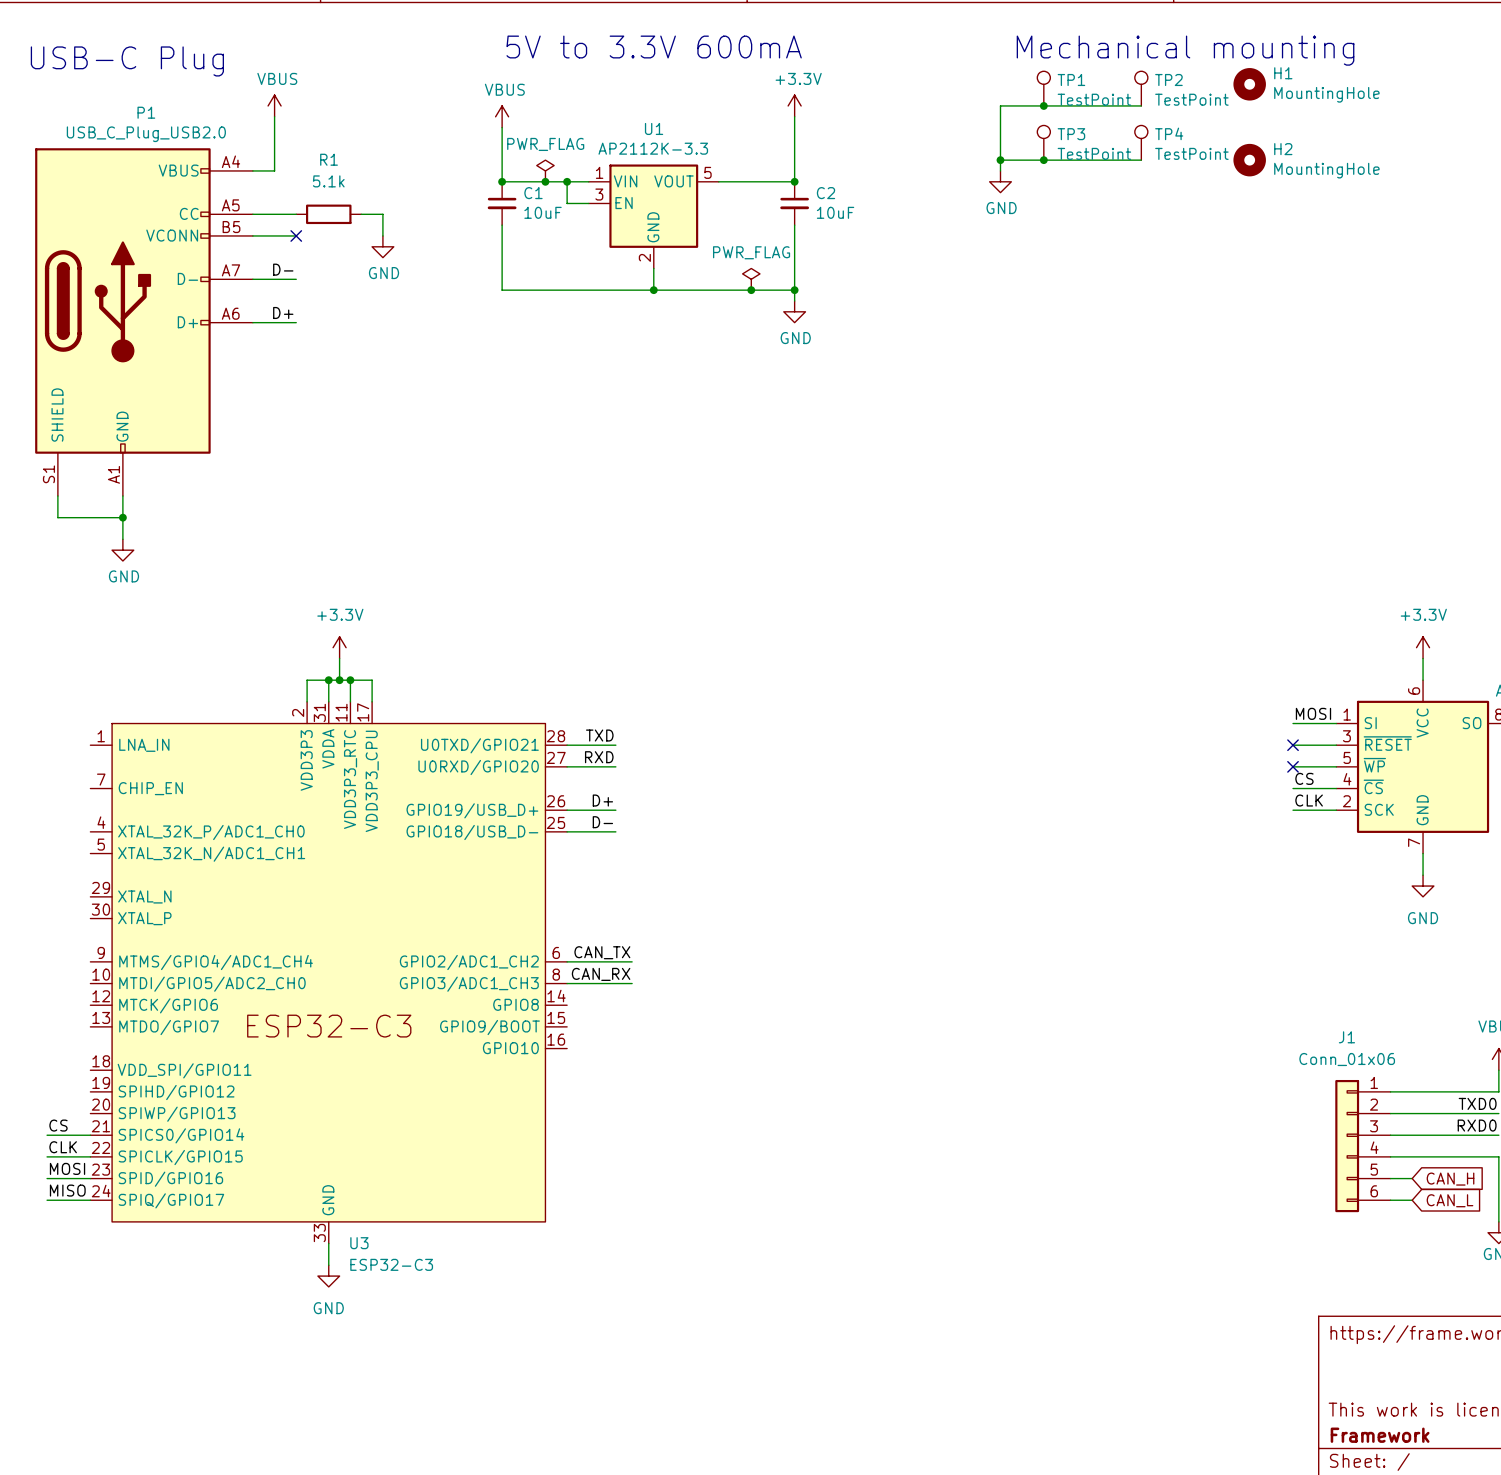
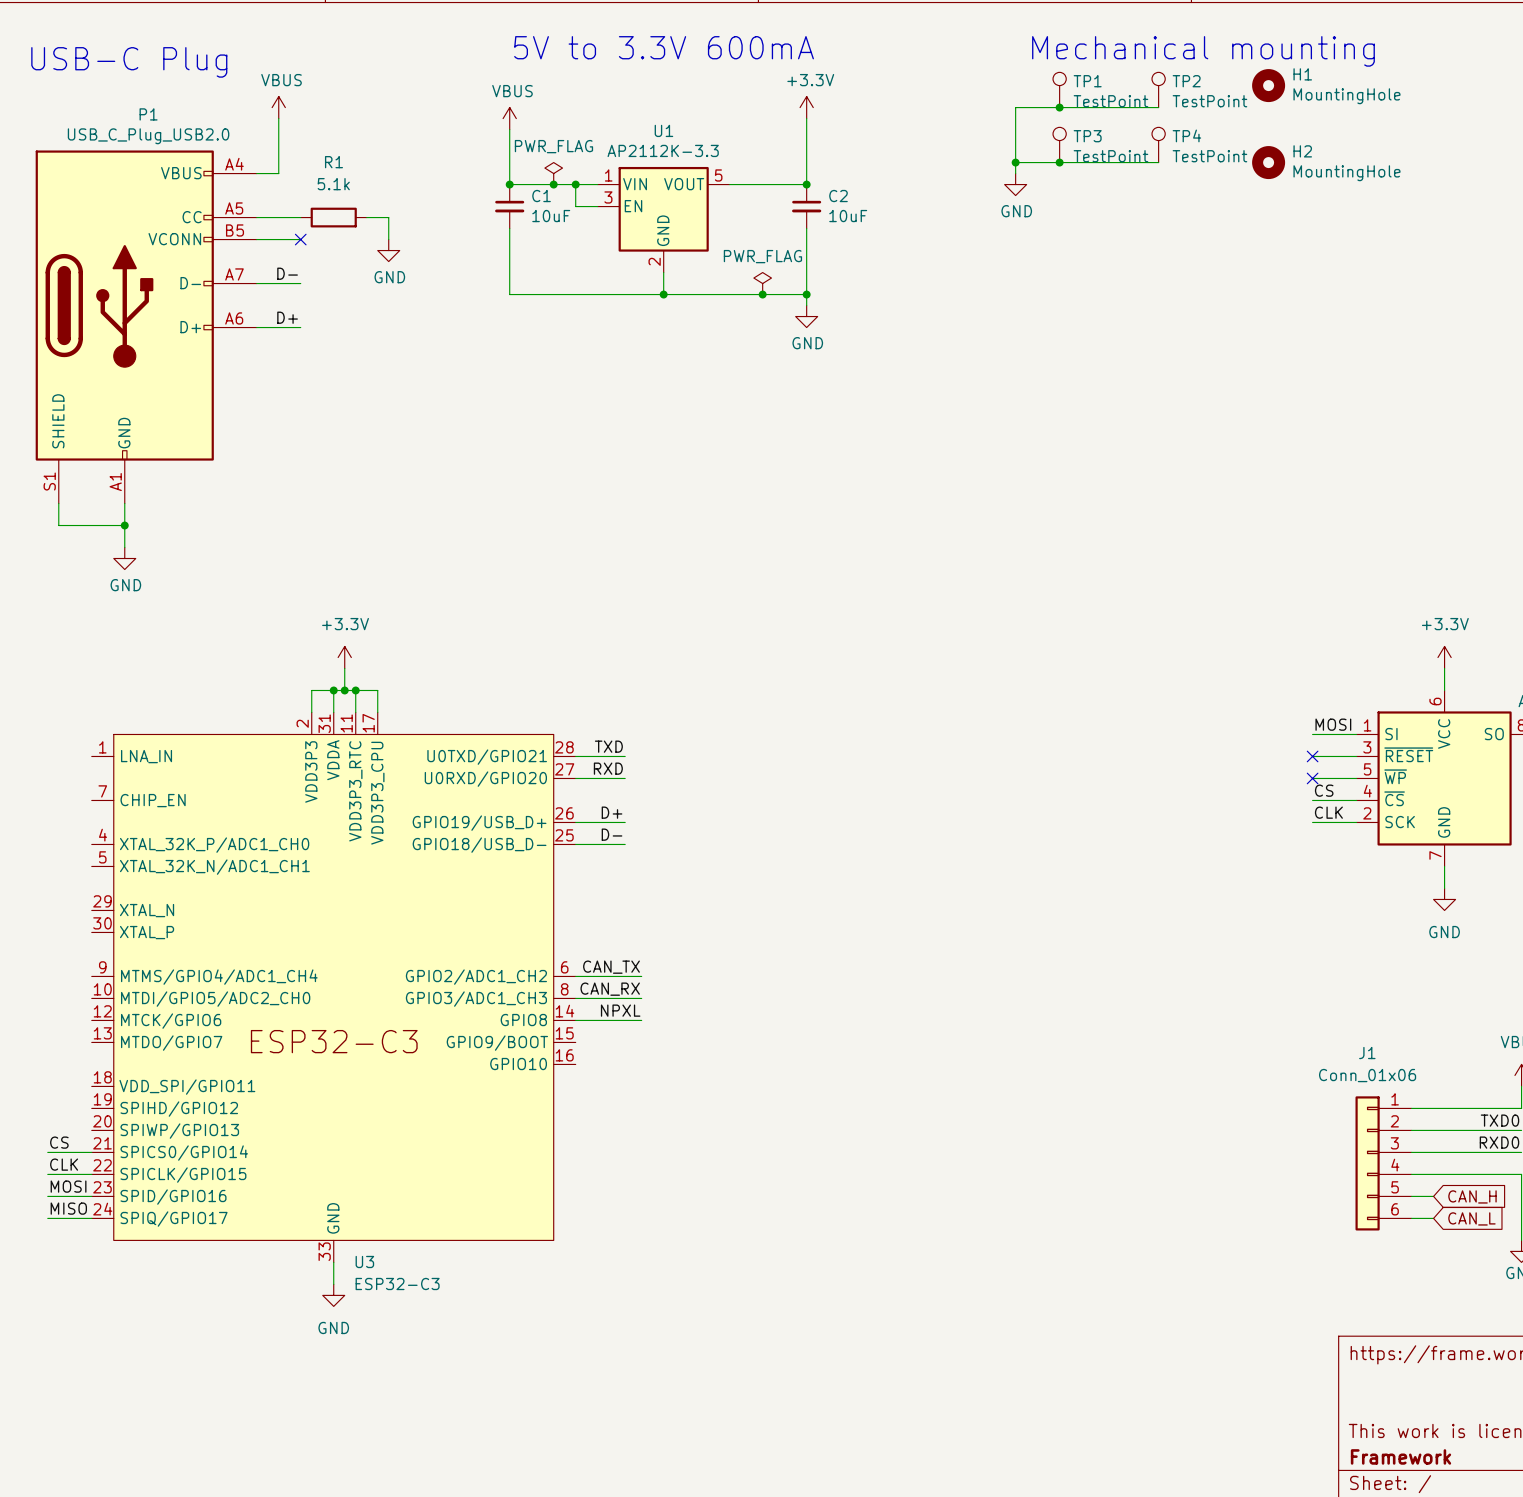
label: none -> NPXL (620, 1010)
wire: none -> (575, 1020) (641, 1020)

